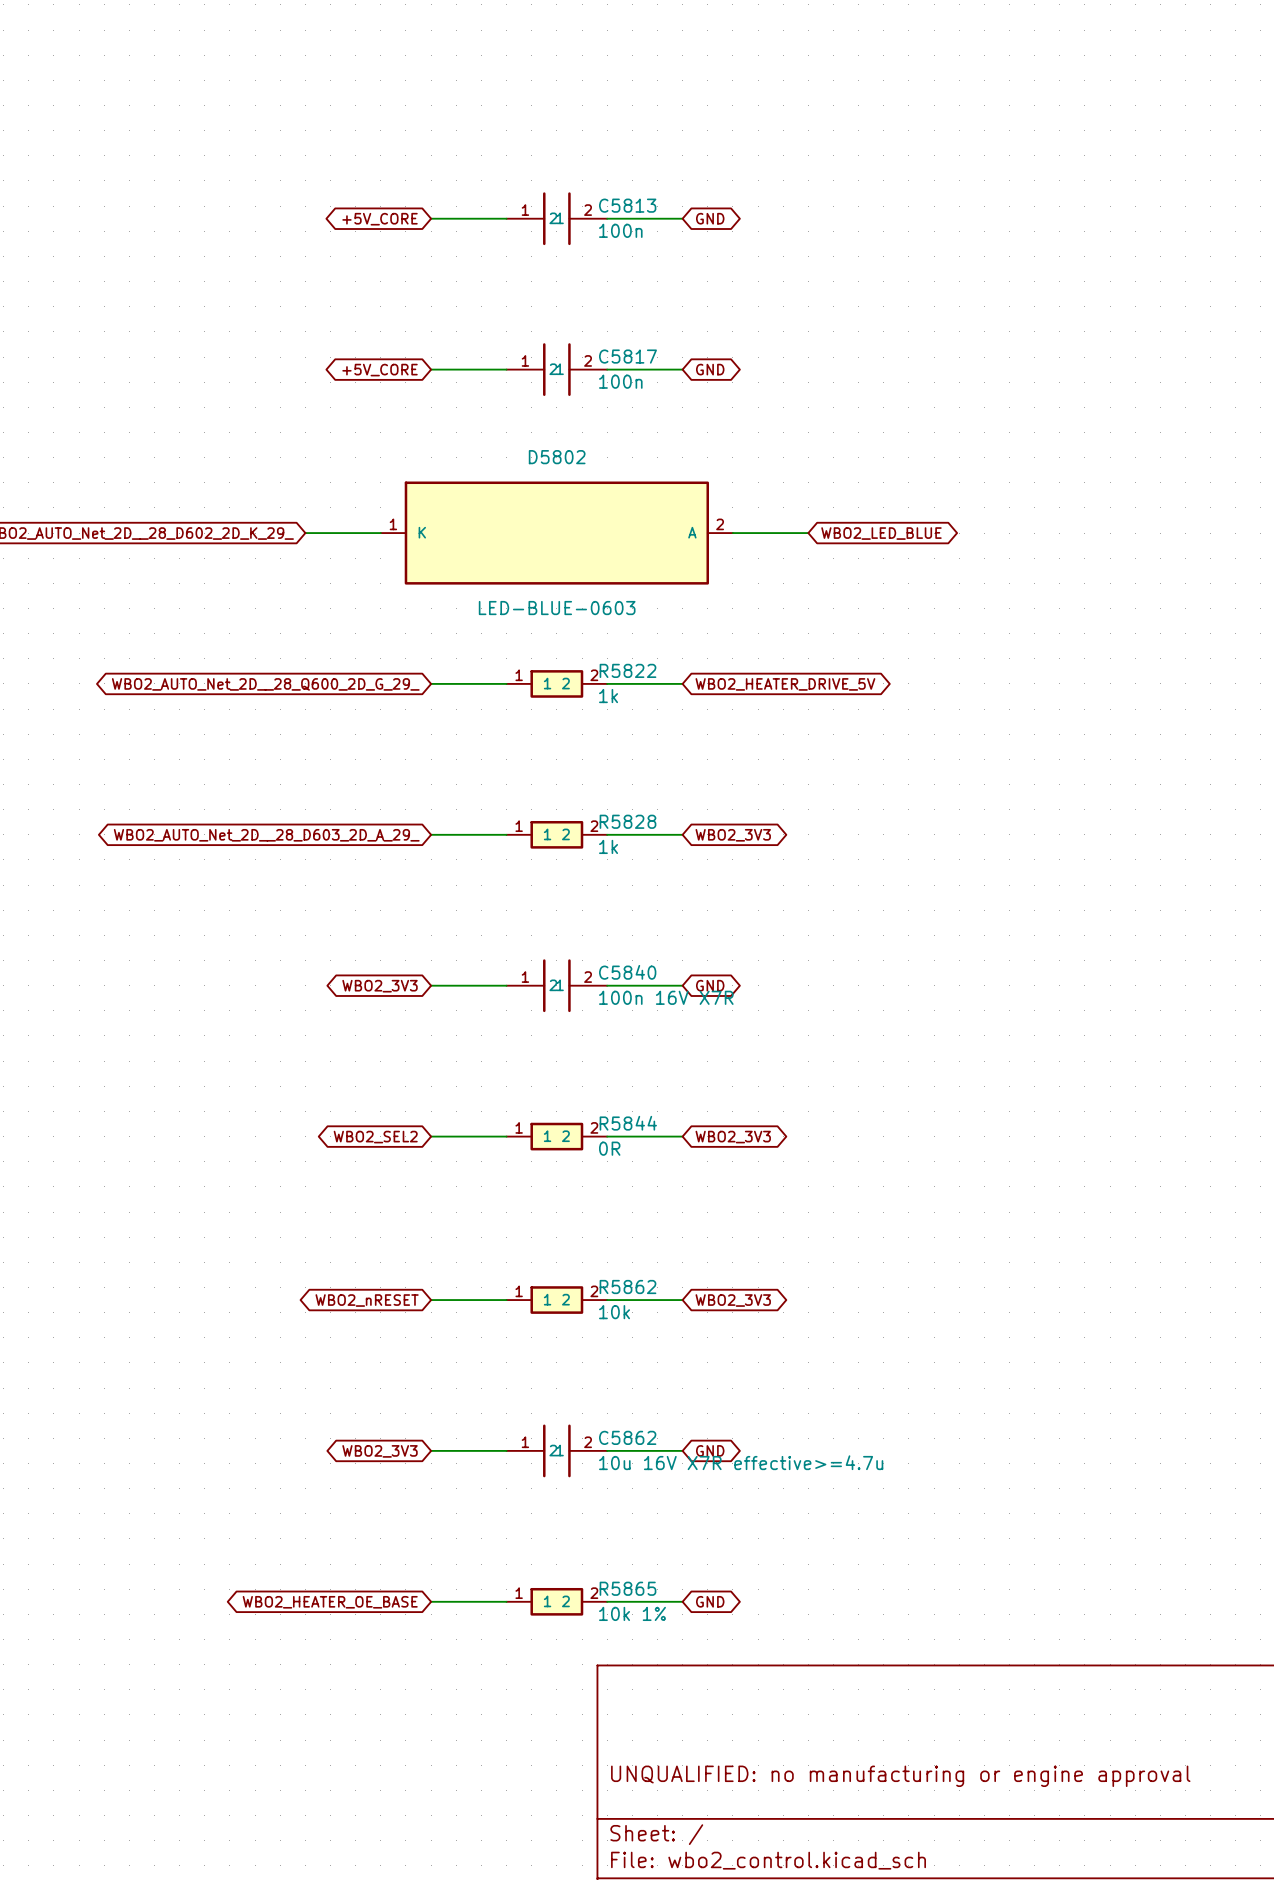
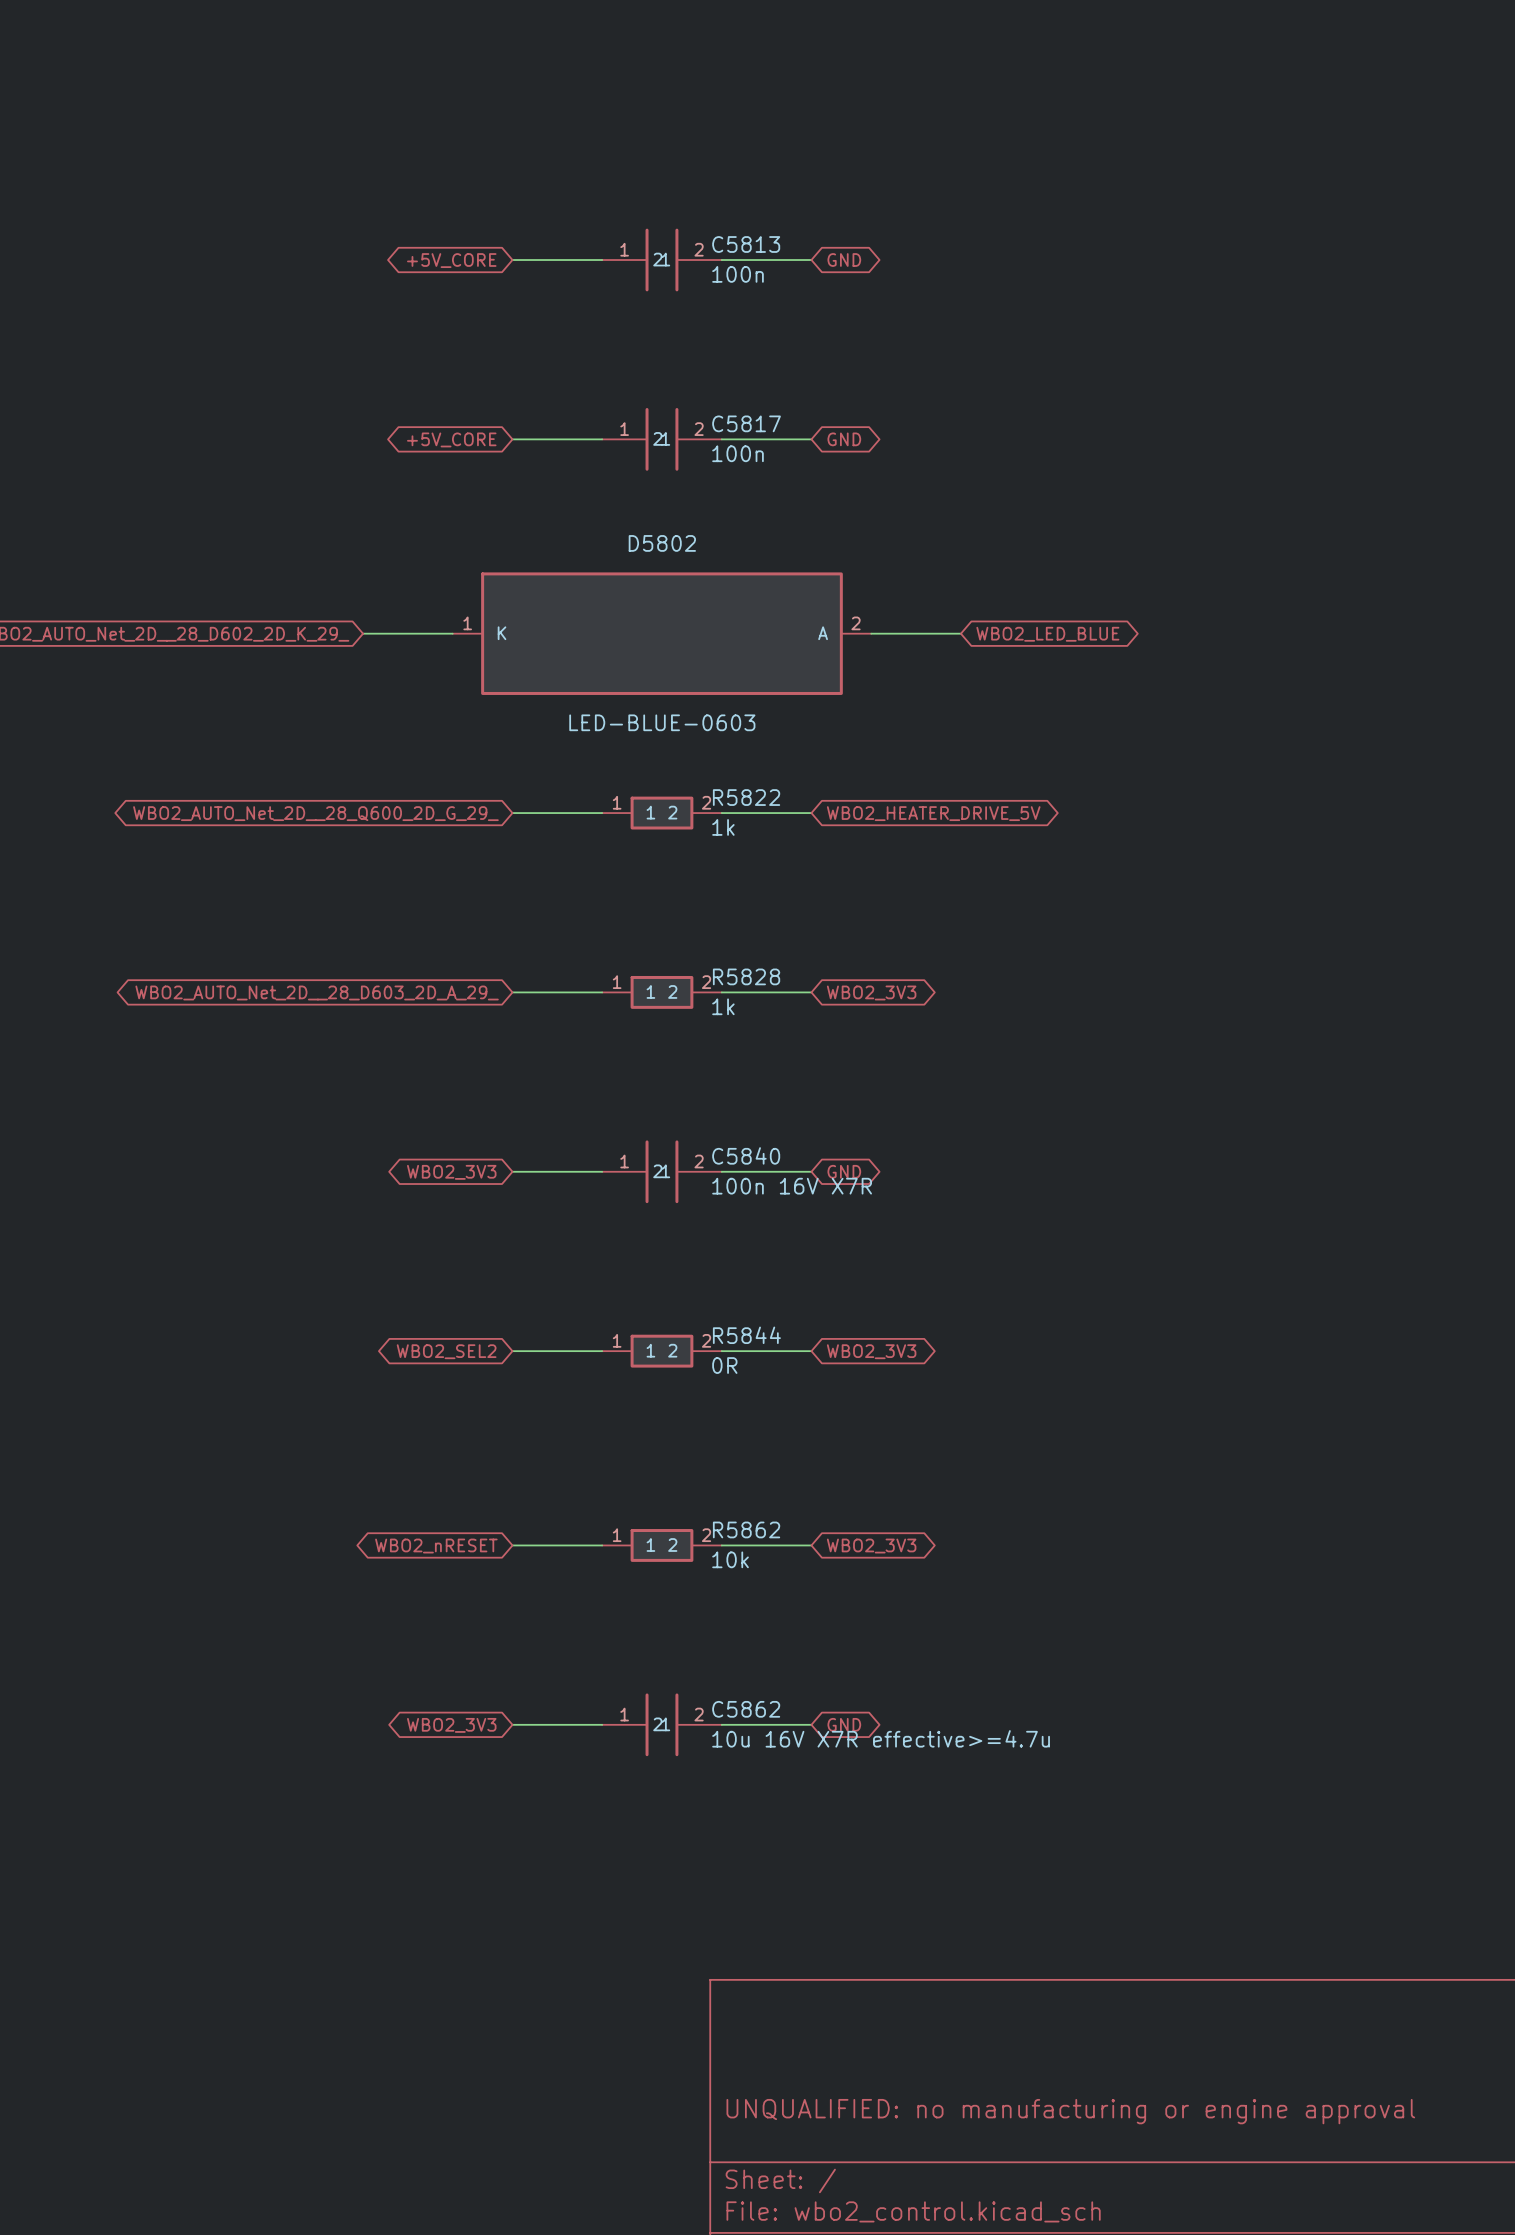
wire: (431, 1601) (506, 1601) -> none
R5865: 10k 1% (556, 1601) -> none
wire: (607, 1601) (682, 1601) -> none
global label: GND (710, 1601) -> none
global label: WBO2_HEATER_OE_BASE (330, 1602) -> none

